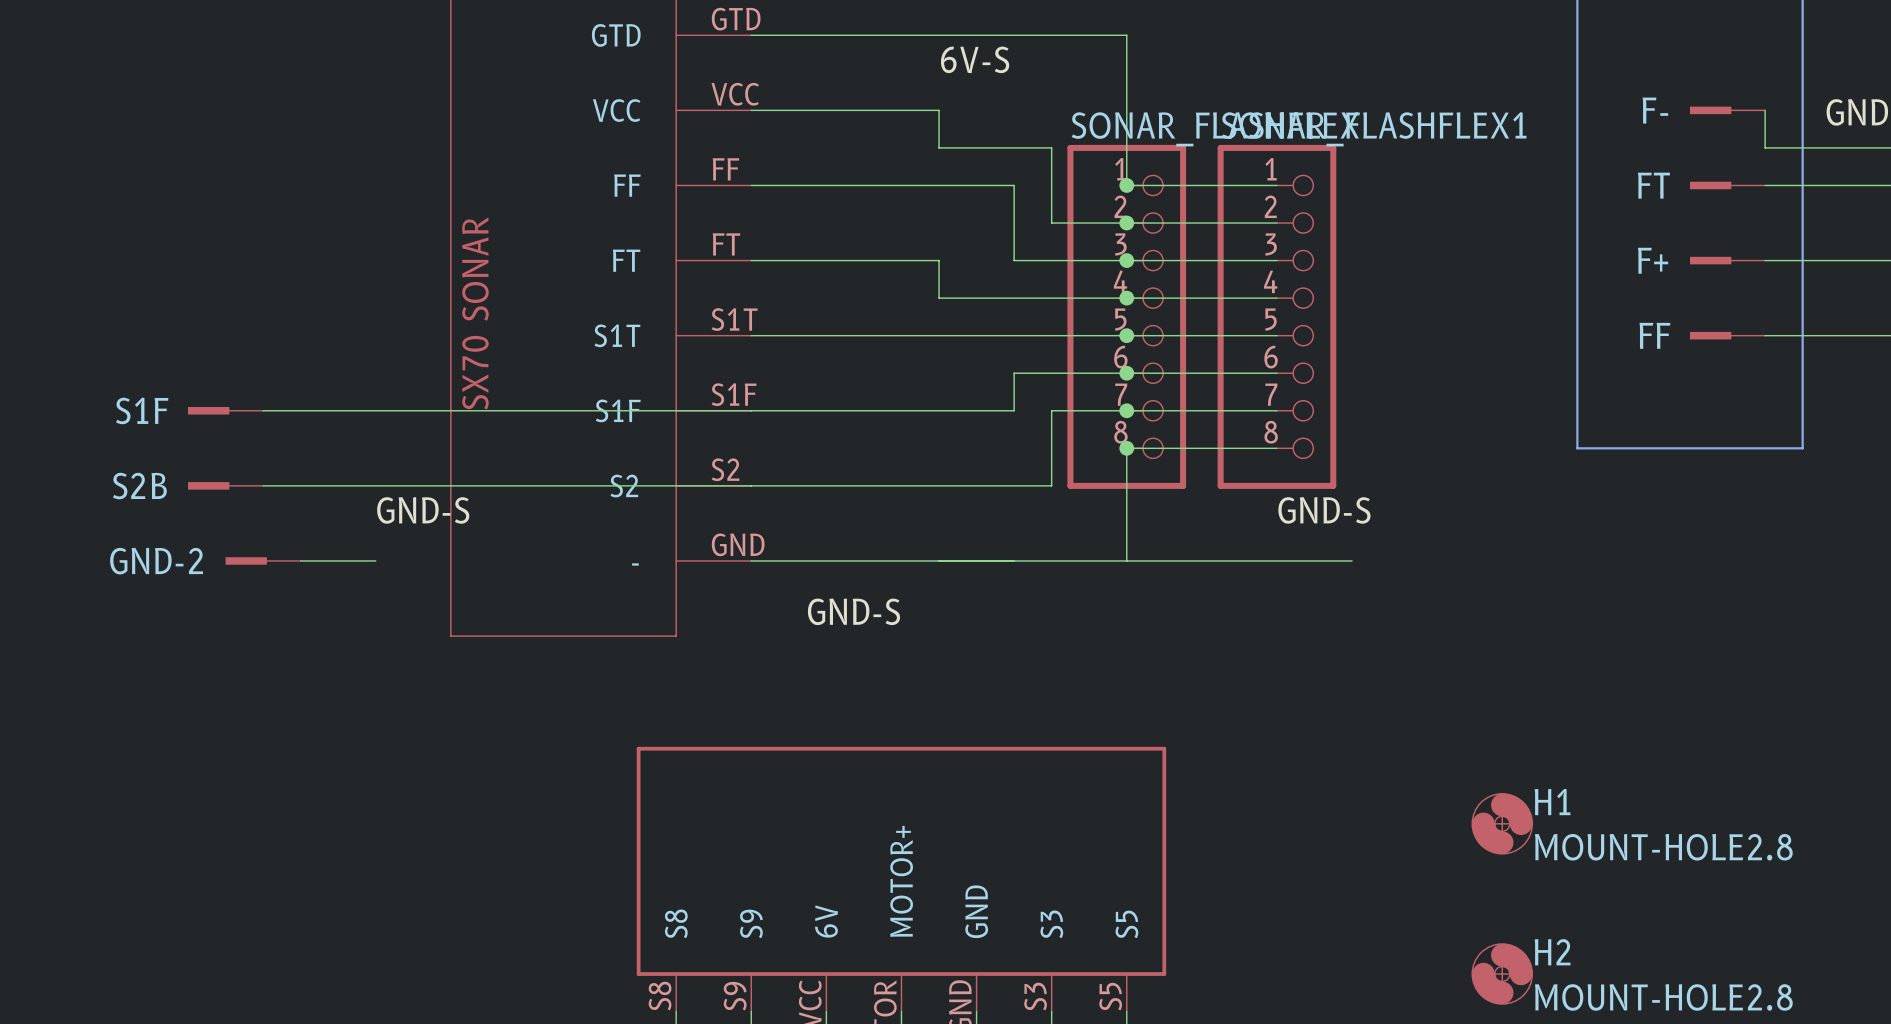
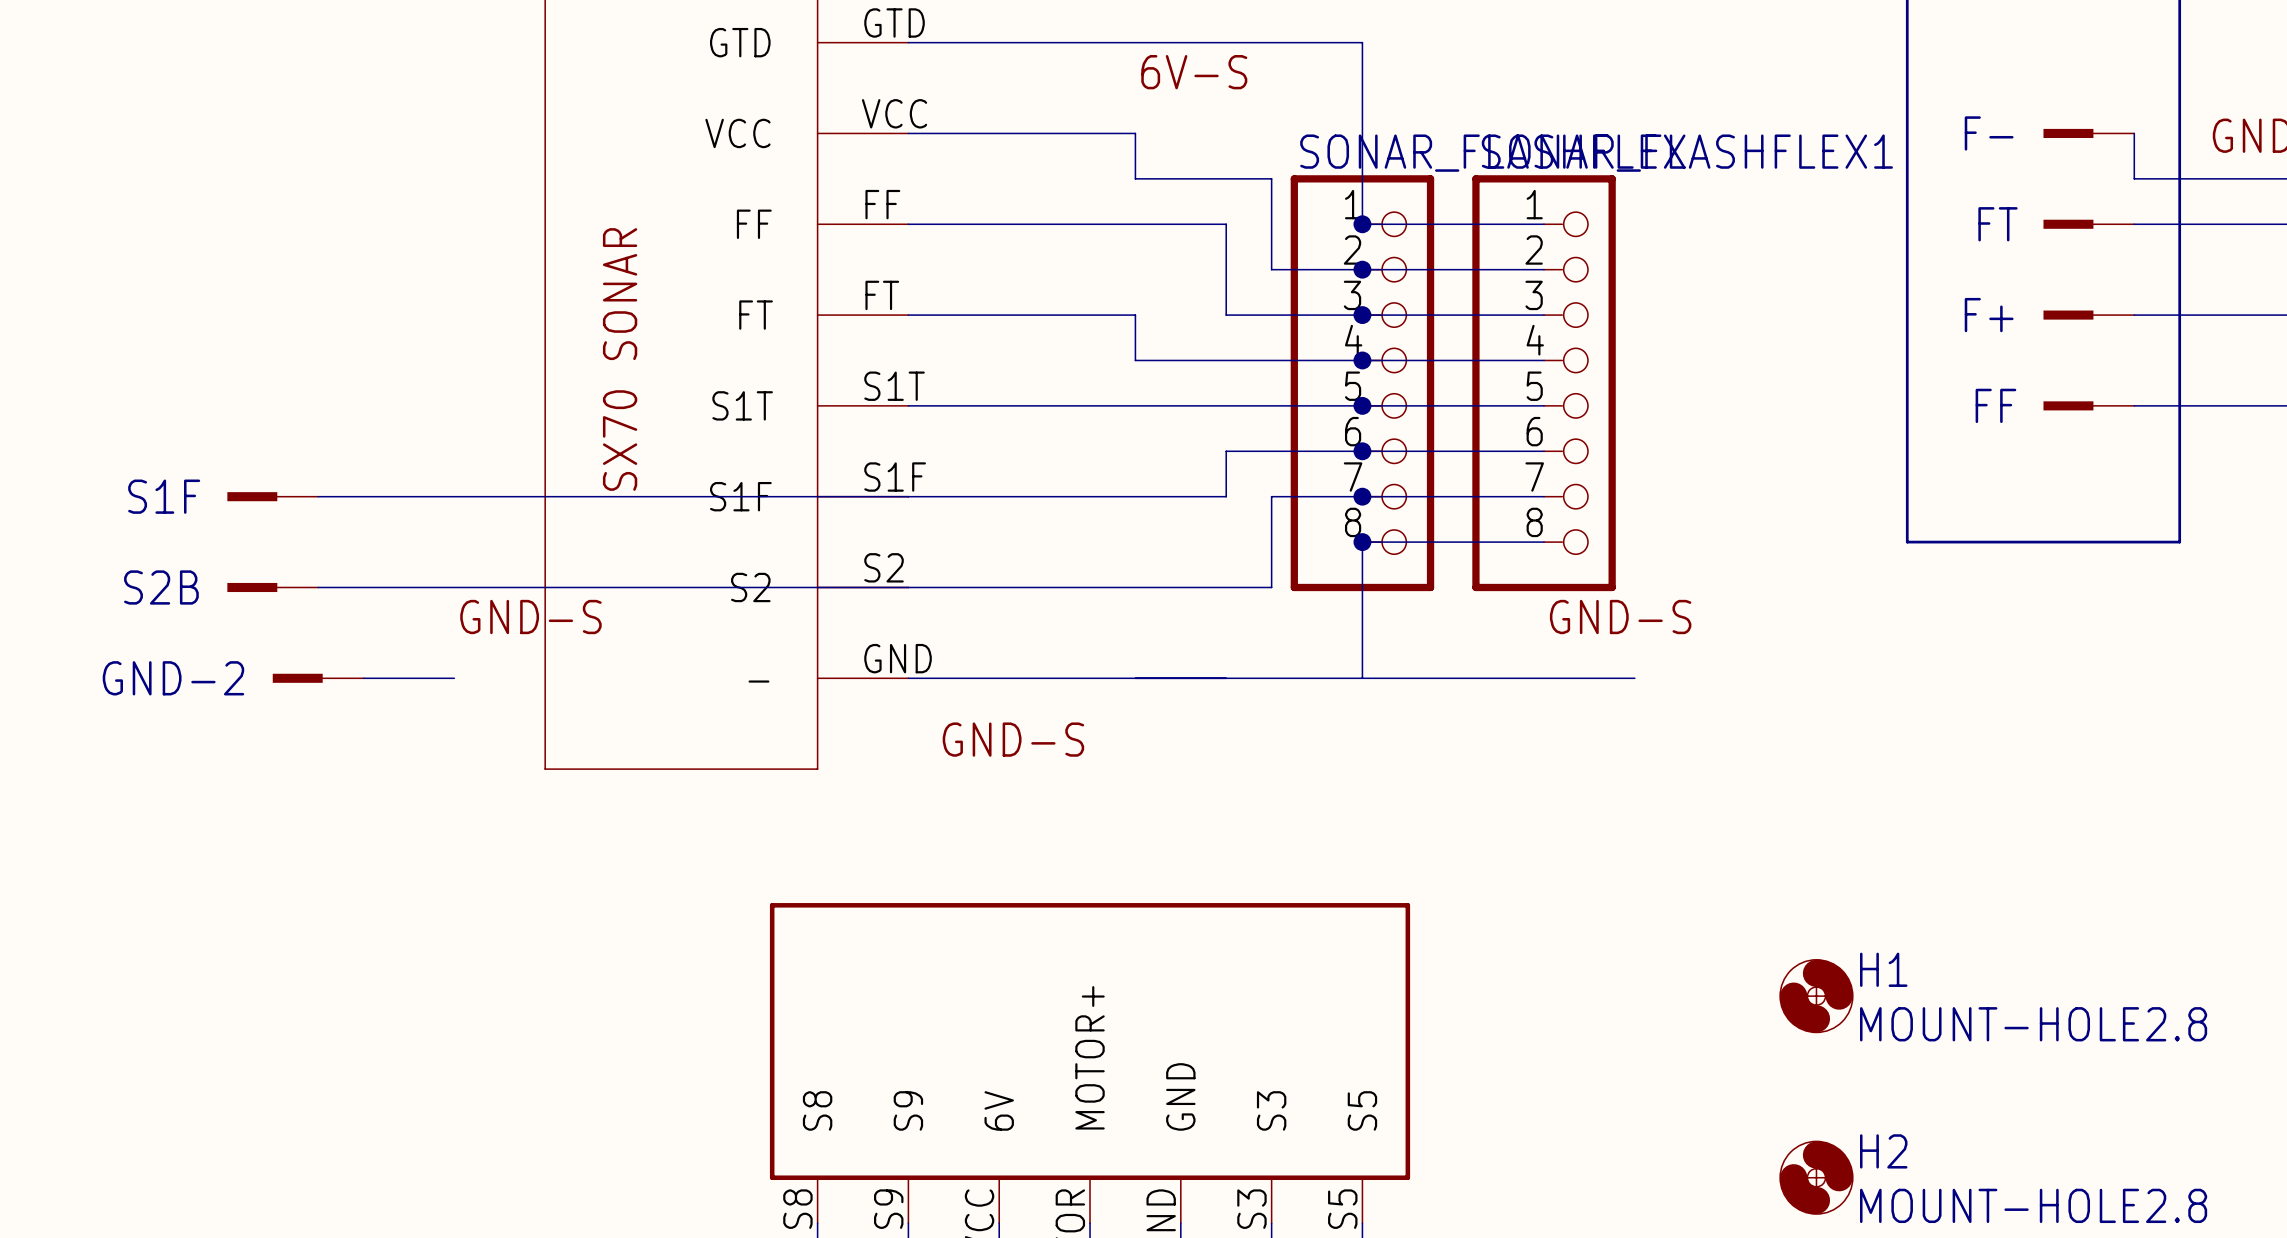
part text position: SX70 SONAR (475, 313) -> SX70 SONAR (620, 359)

